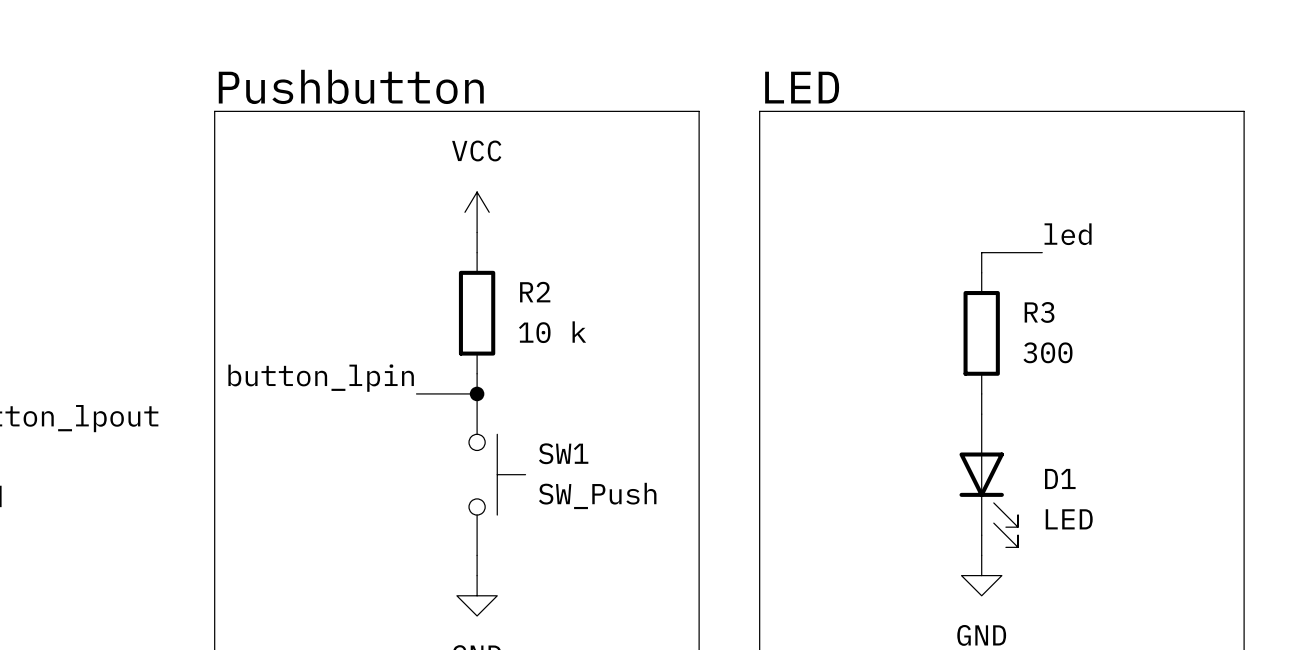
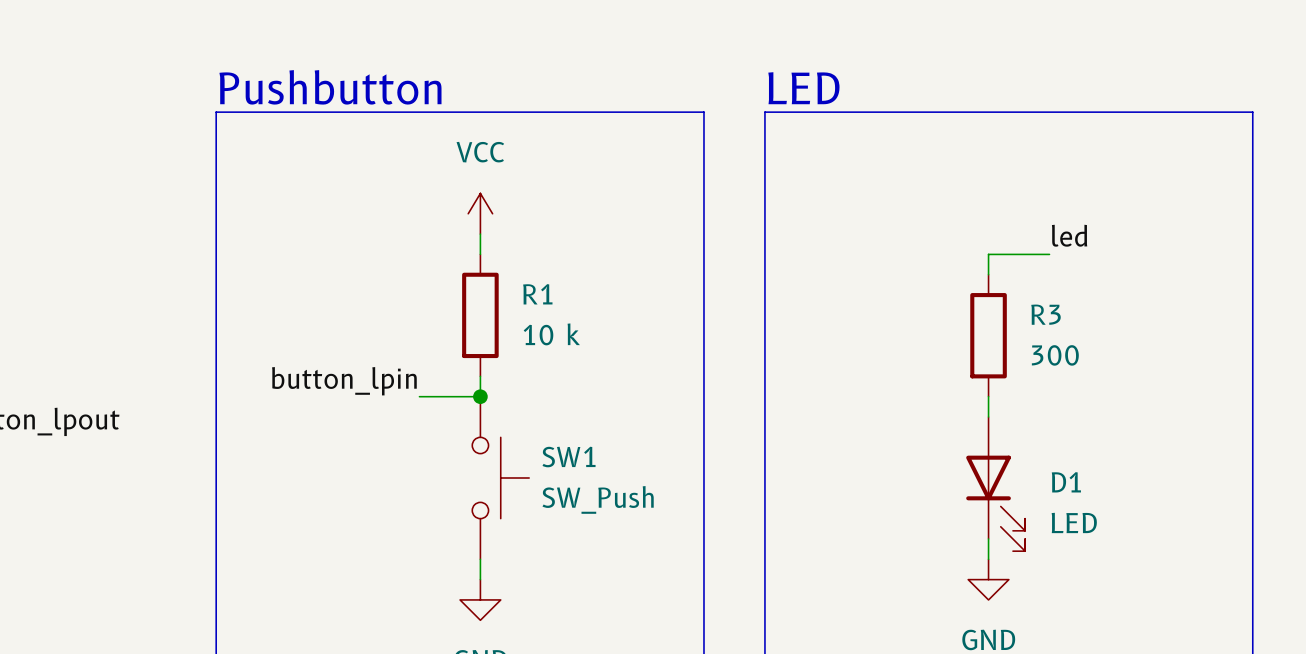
R2 name: R2 (535, 292) -> R1 (537, 294)

